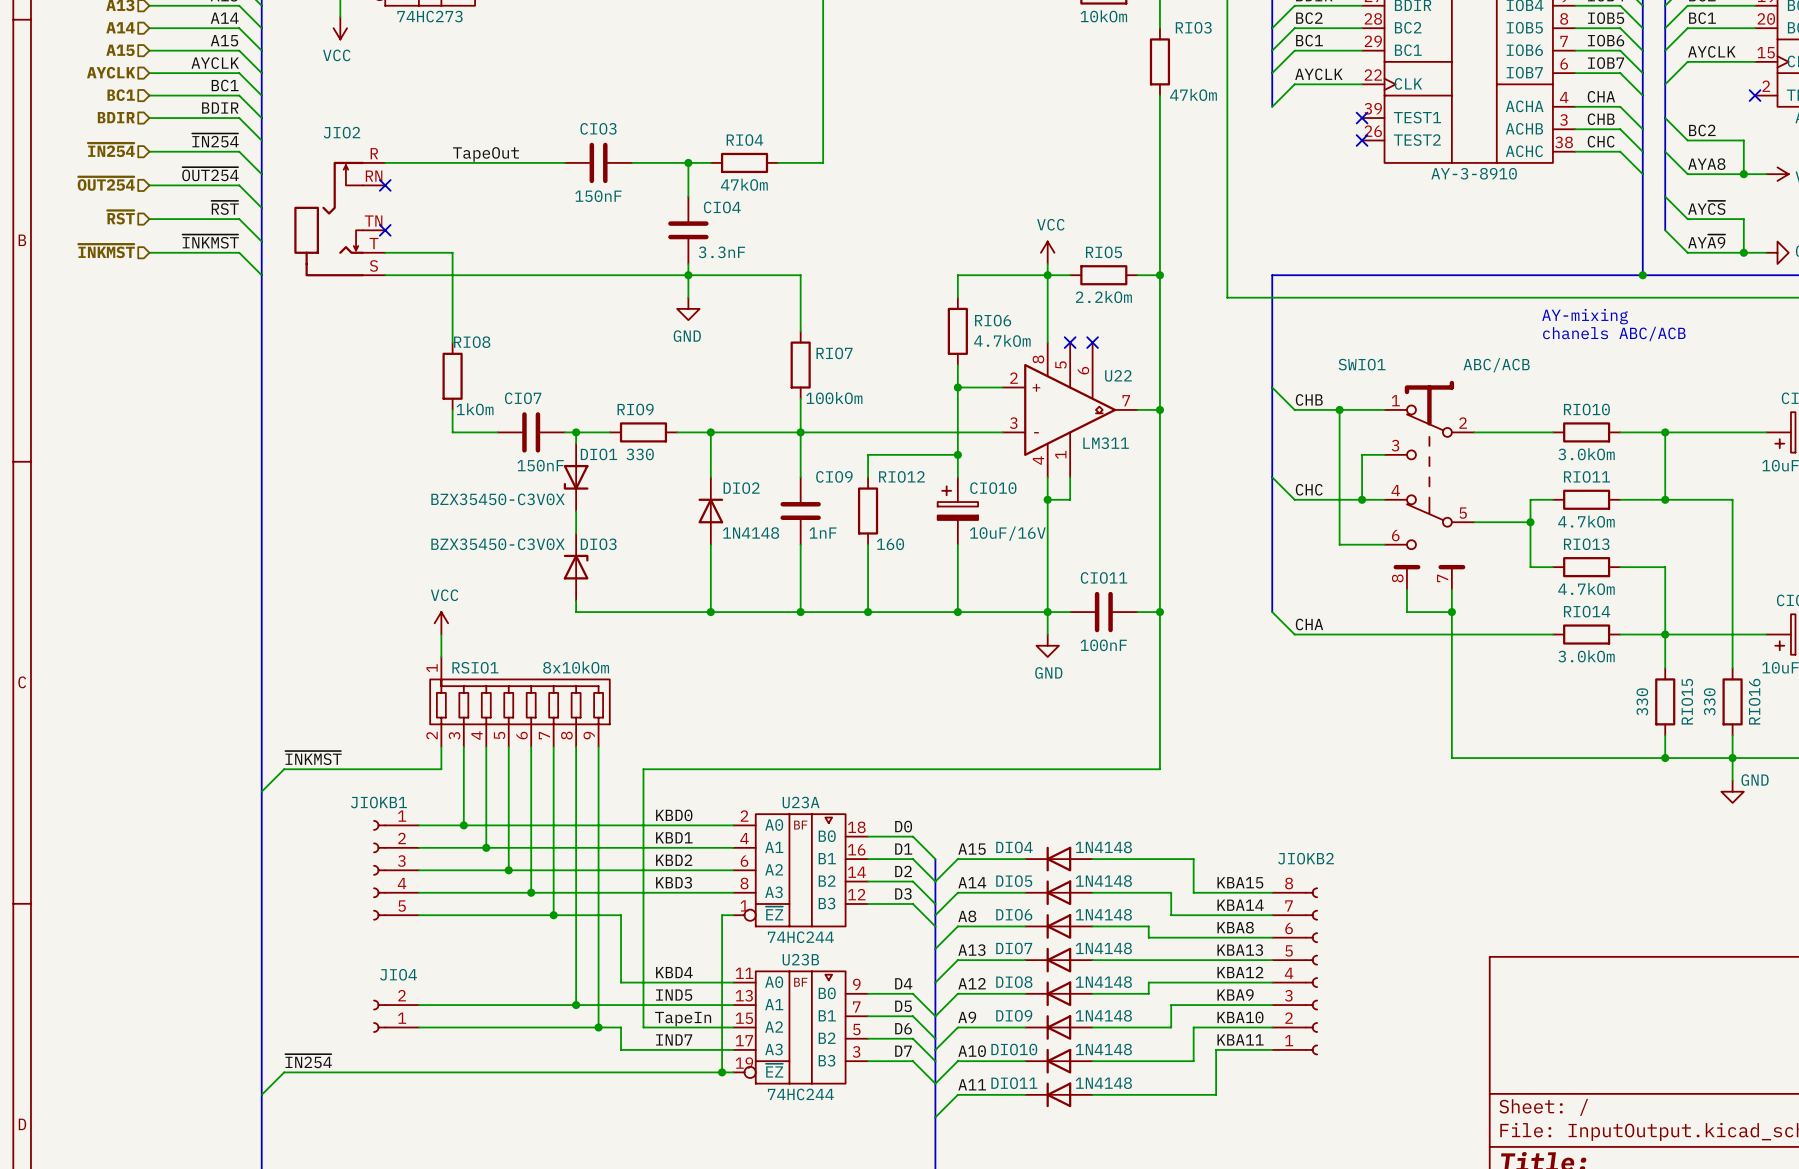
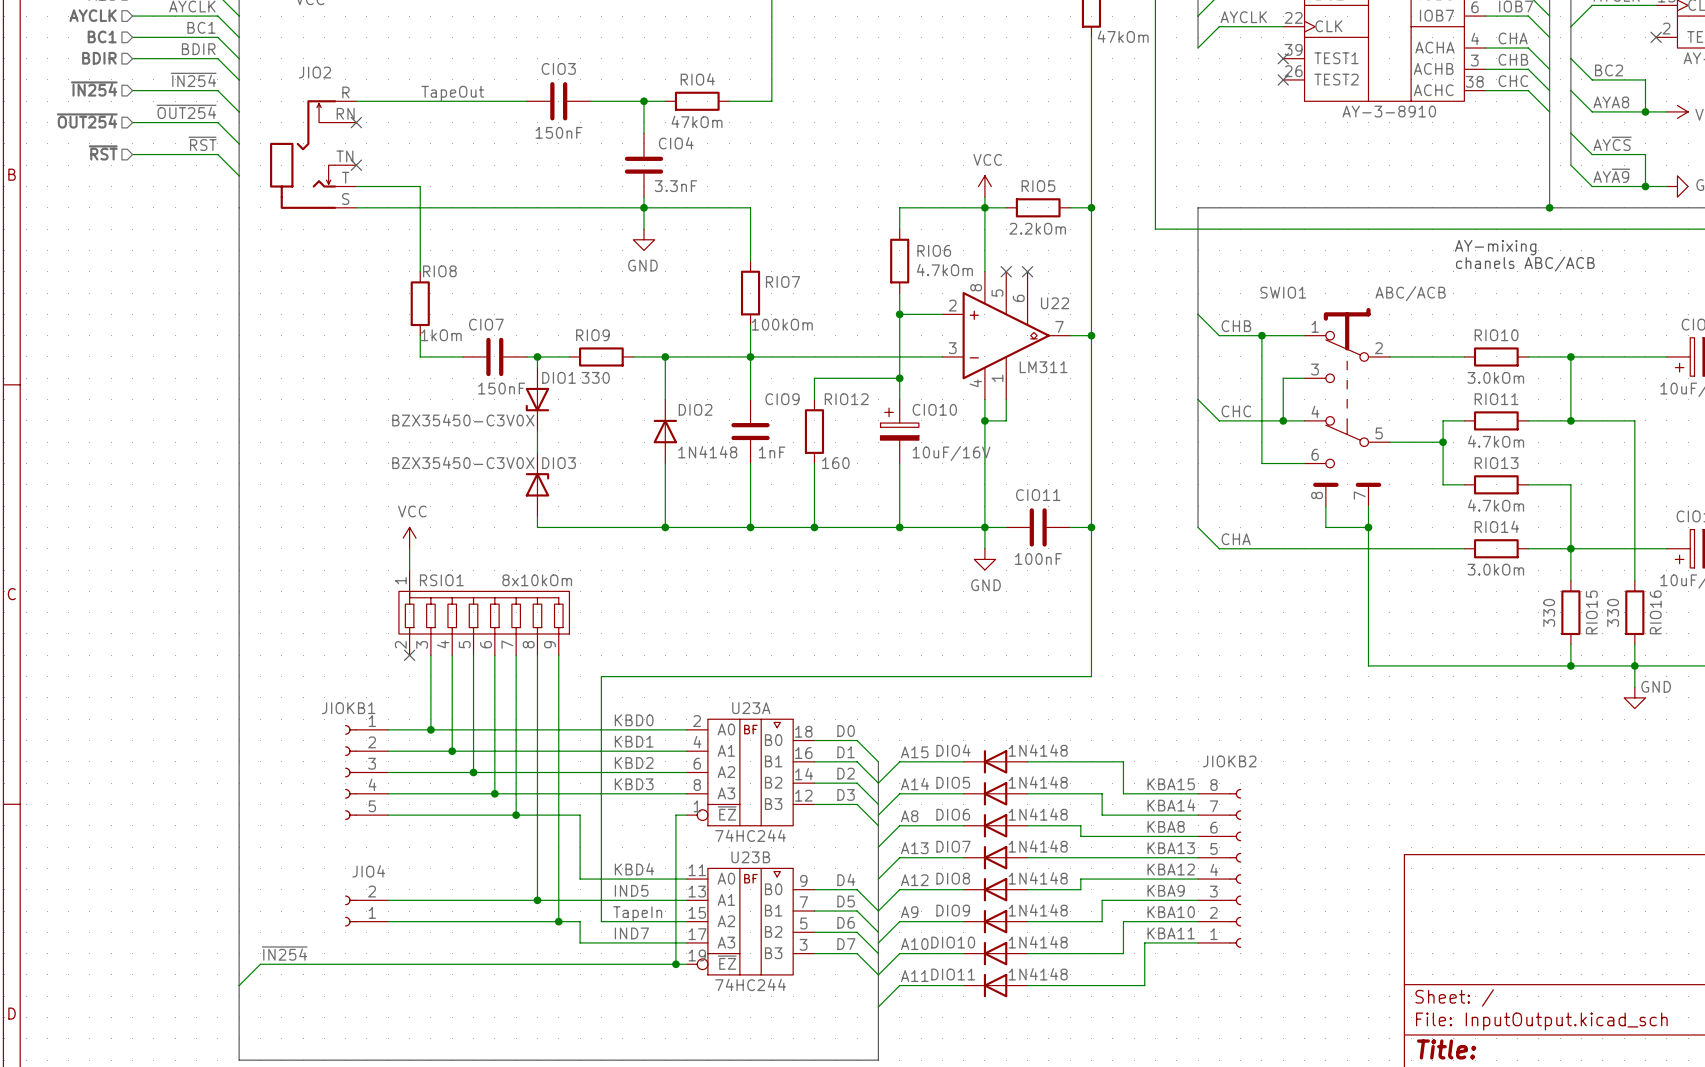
label: ~{INKMST} (210, 241) -> none
hierarchical label: ~{INKMST} (106, 251) -> none
wire: (149, 252) (239, 252) (261, 275) -> none
wire: (441, 746) (441, 769) (284, 769) (261, 791) -> none
no-connect mark: none -> (409, 655)
label: ~{INKMST} (313, 758) -> none

